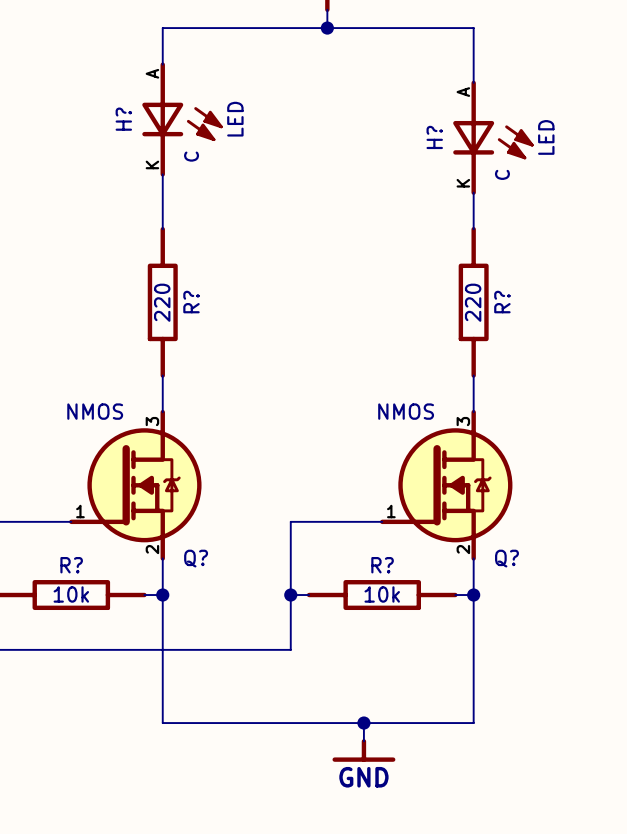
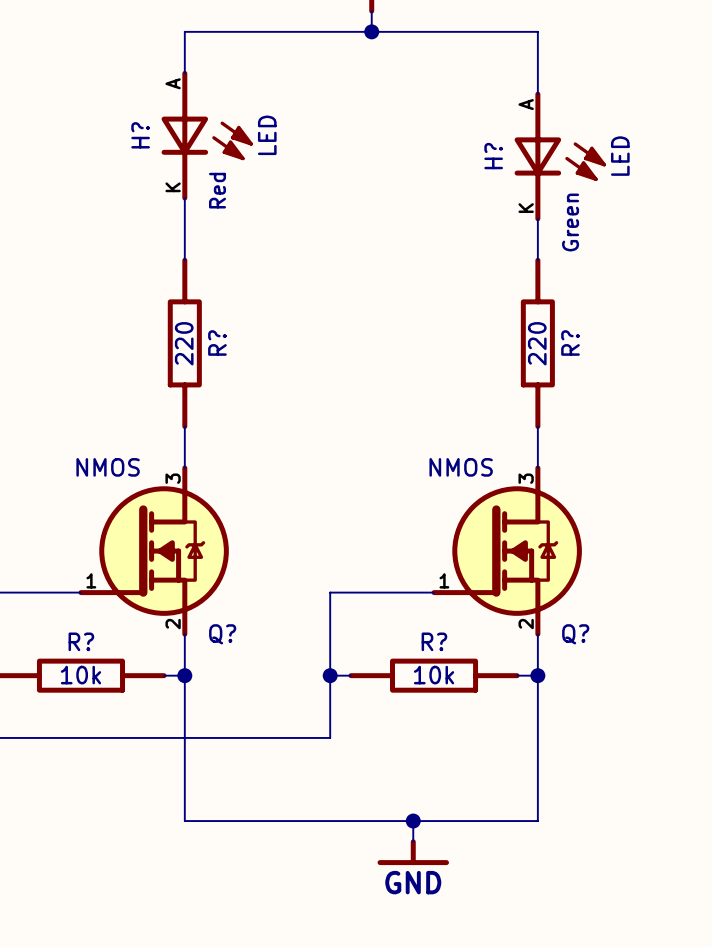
H? text: C (191, 156) -> Red (217, 190)
H? text: C (502, 174) -> Green (570, 222)

